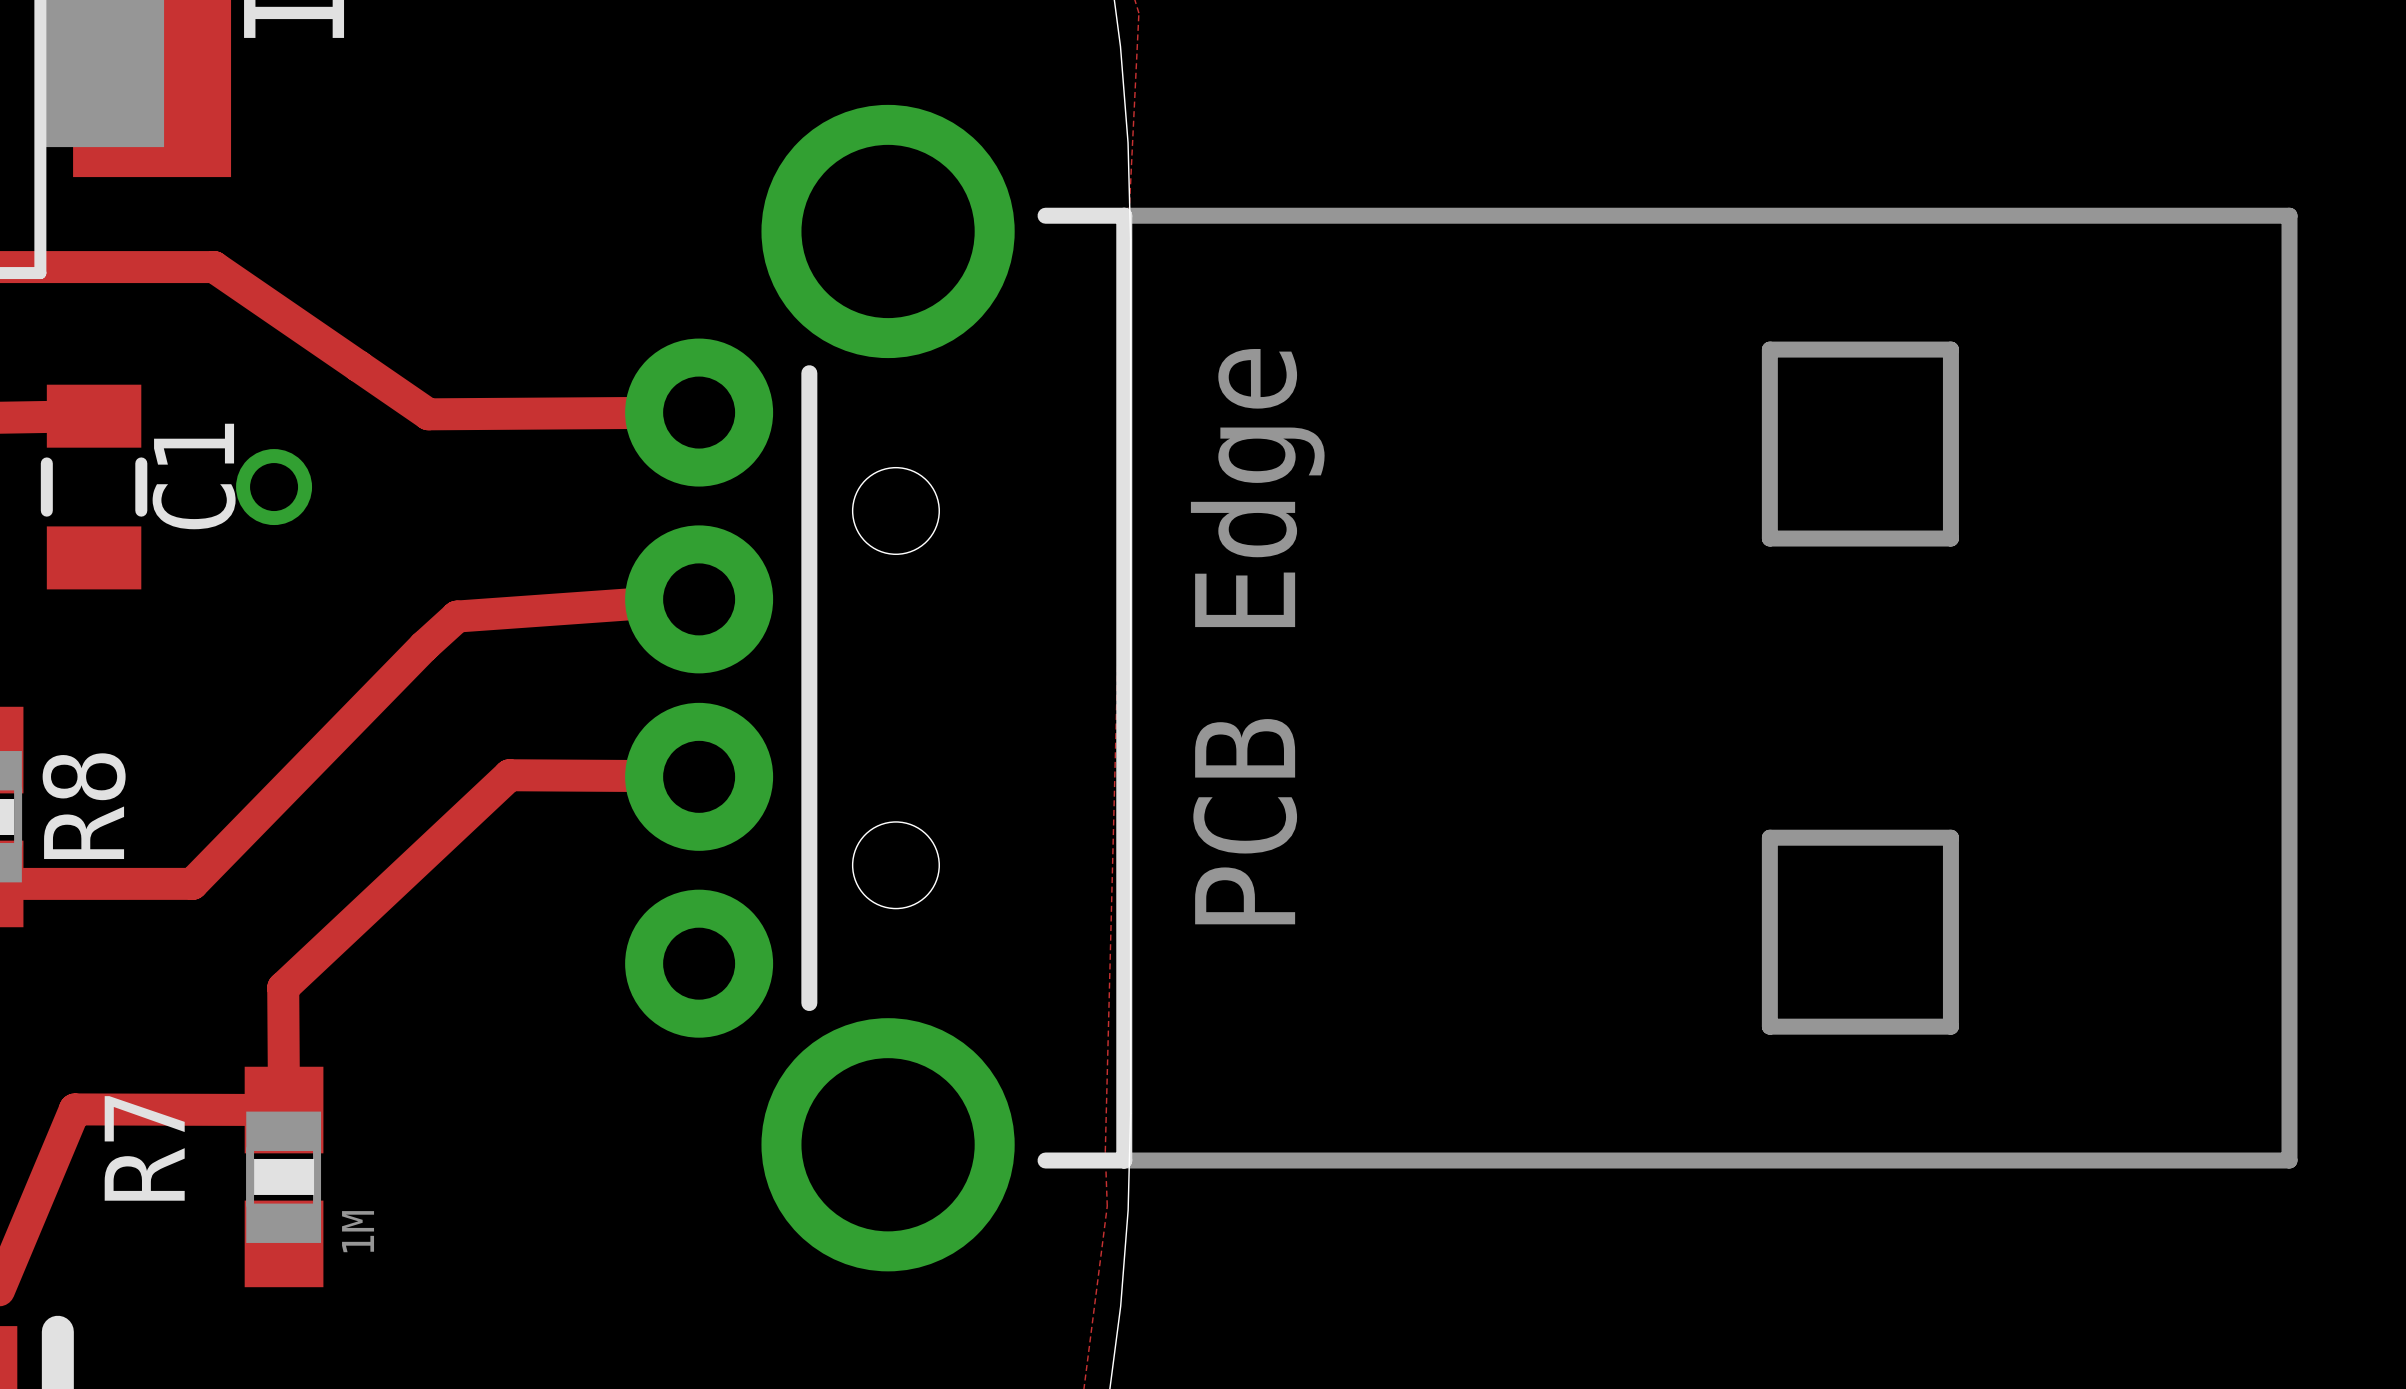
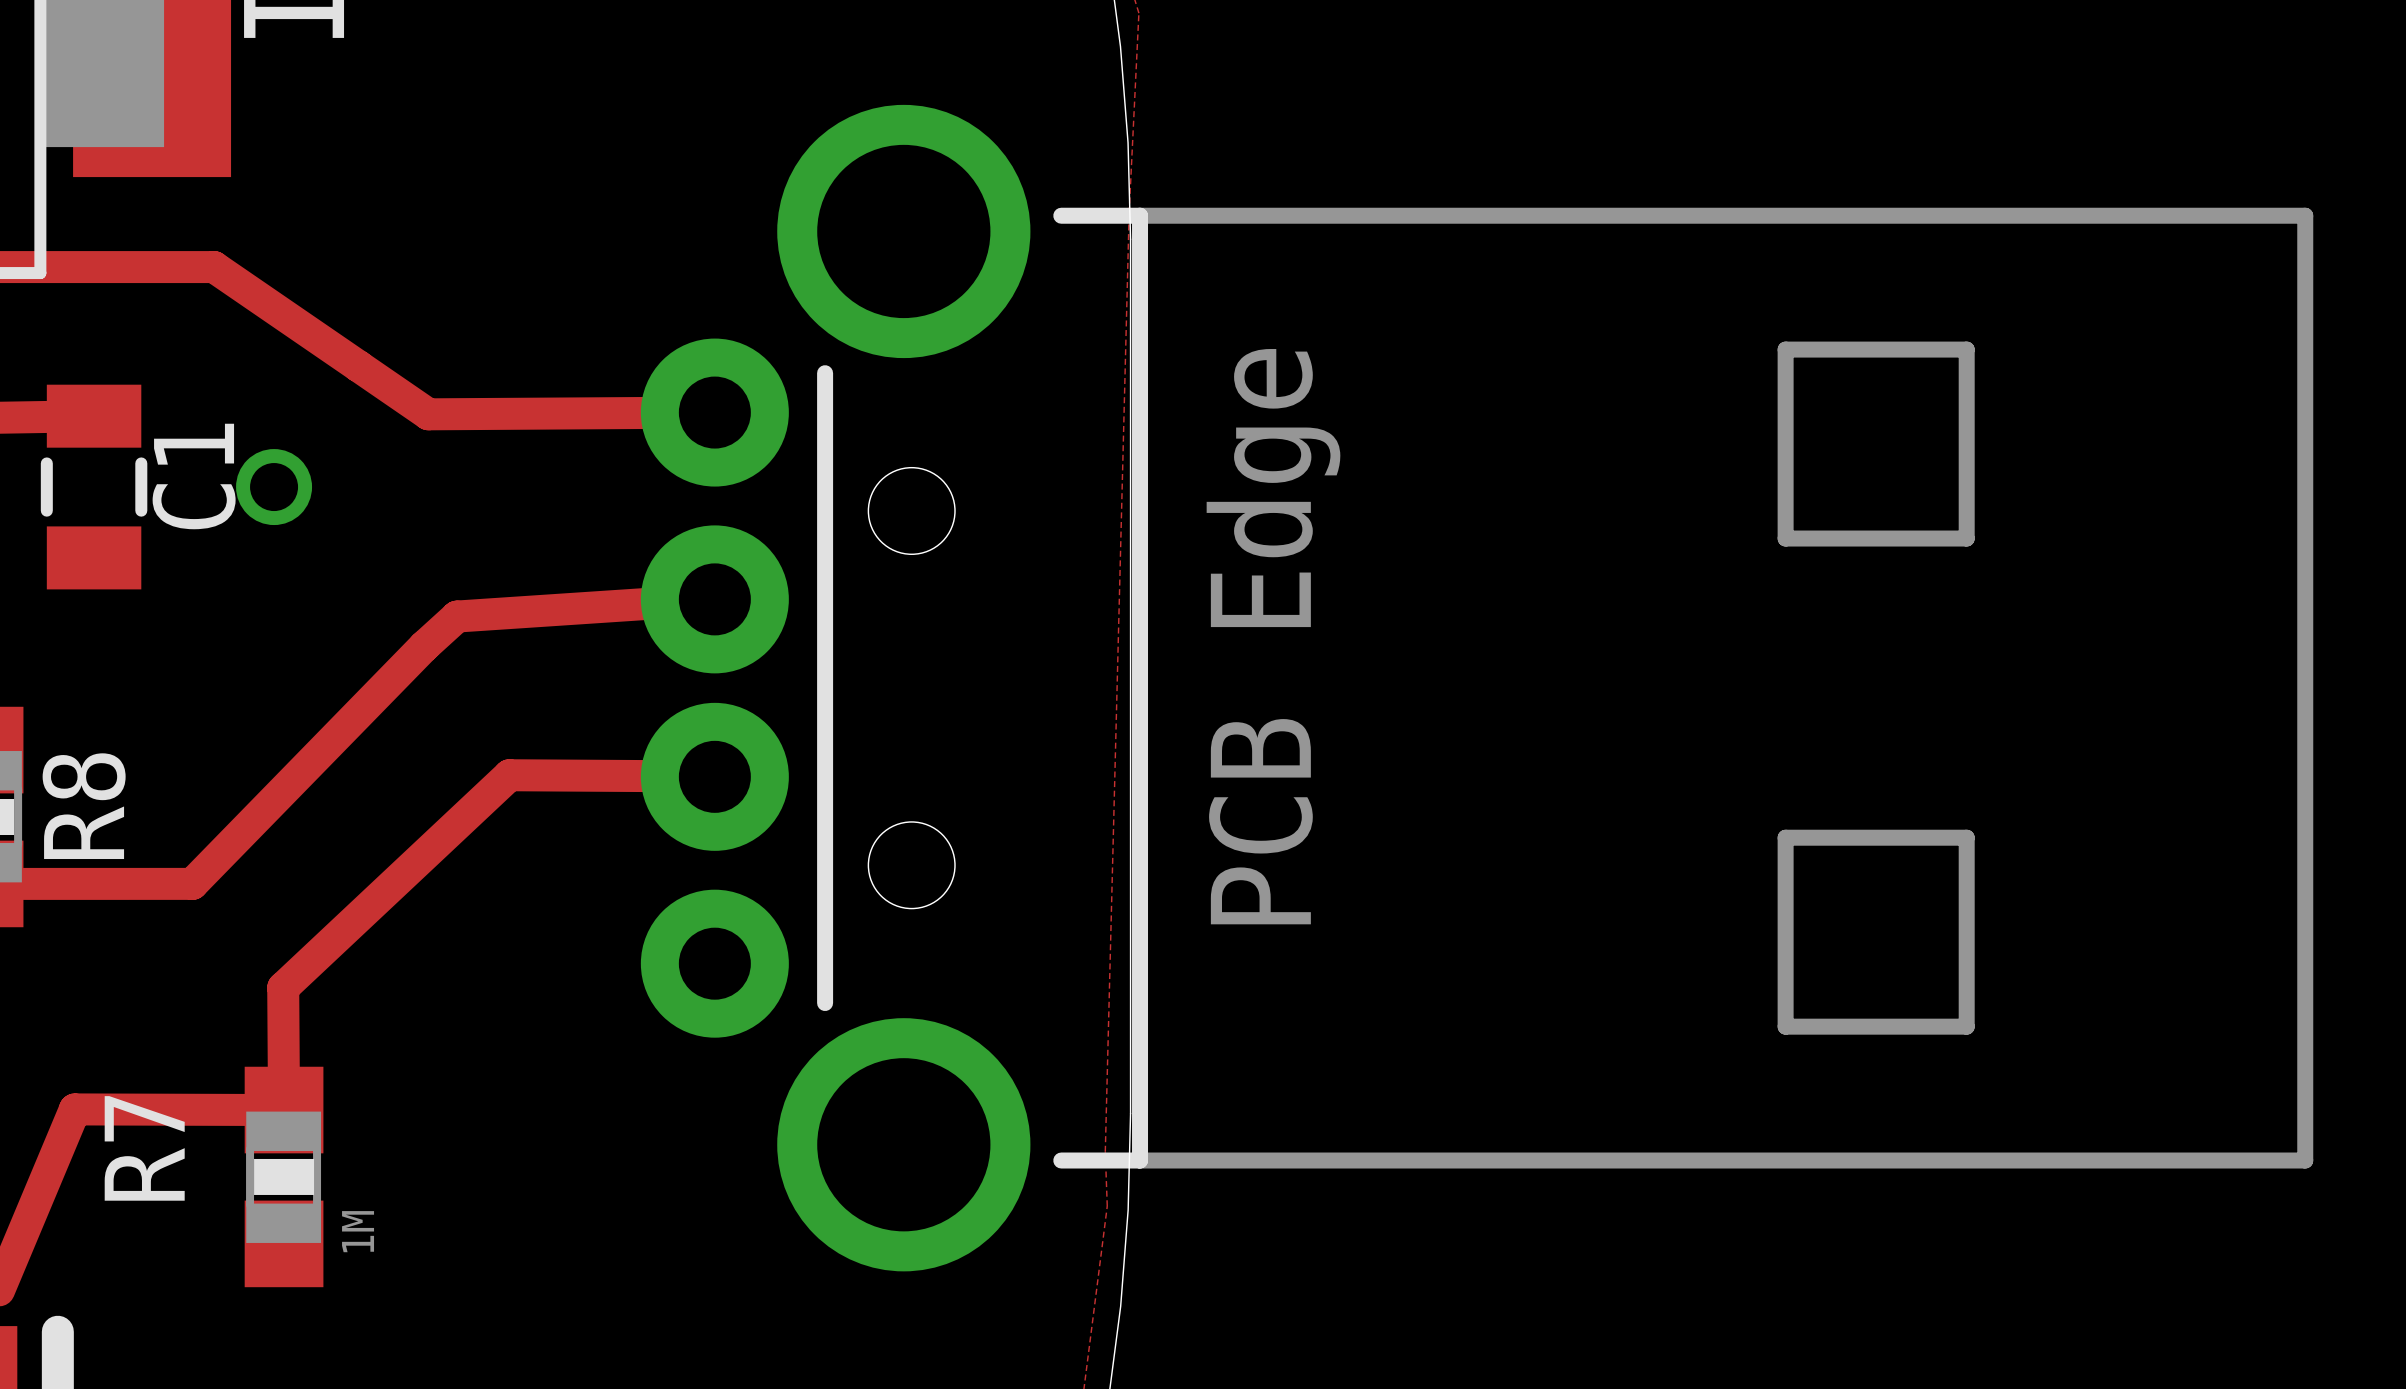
track: (699, 412) (428, 414) -> (714, 412) (428, 414)
track: (699, 599) (457, 616) -> (714, 599) (457, 616)
part position: (1461, 688) -> (1477, 688)

